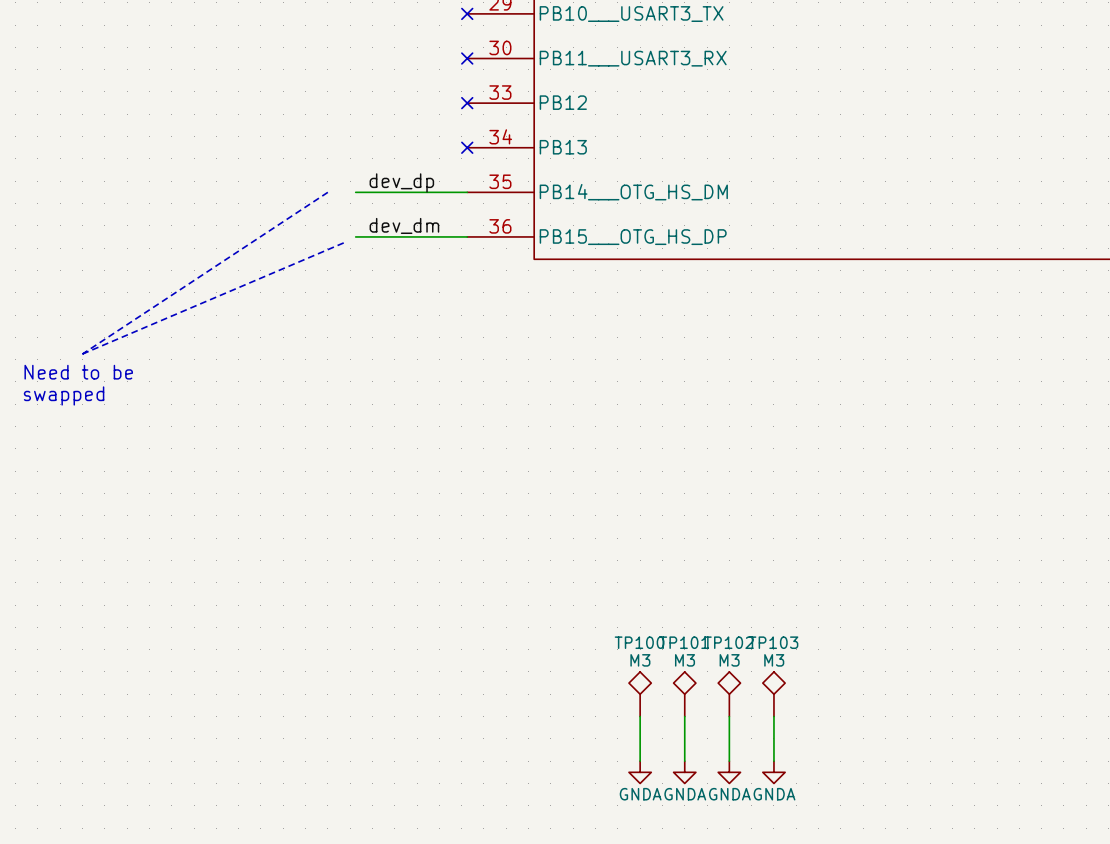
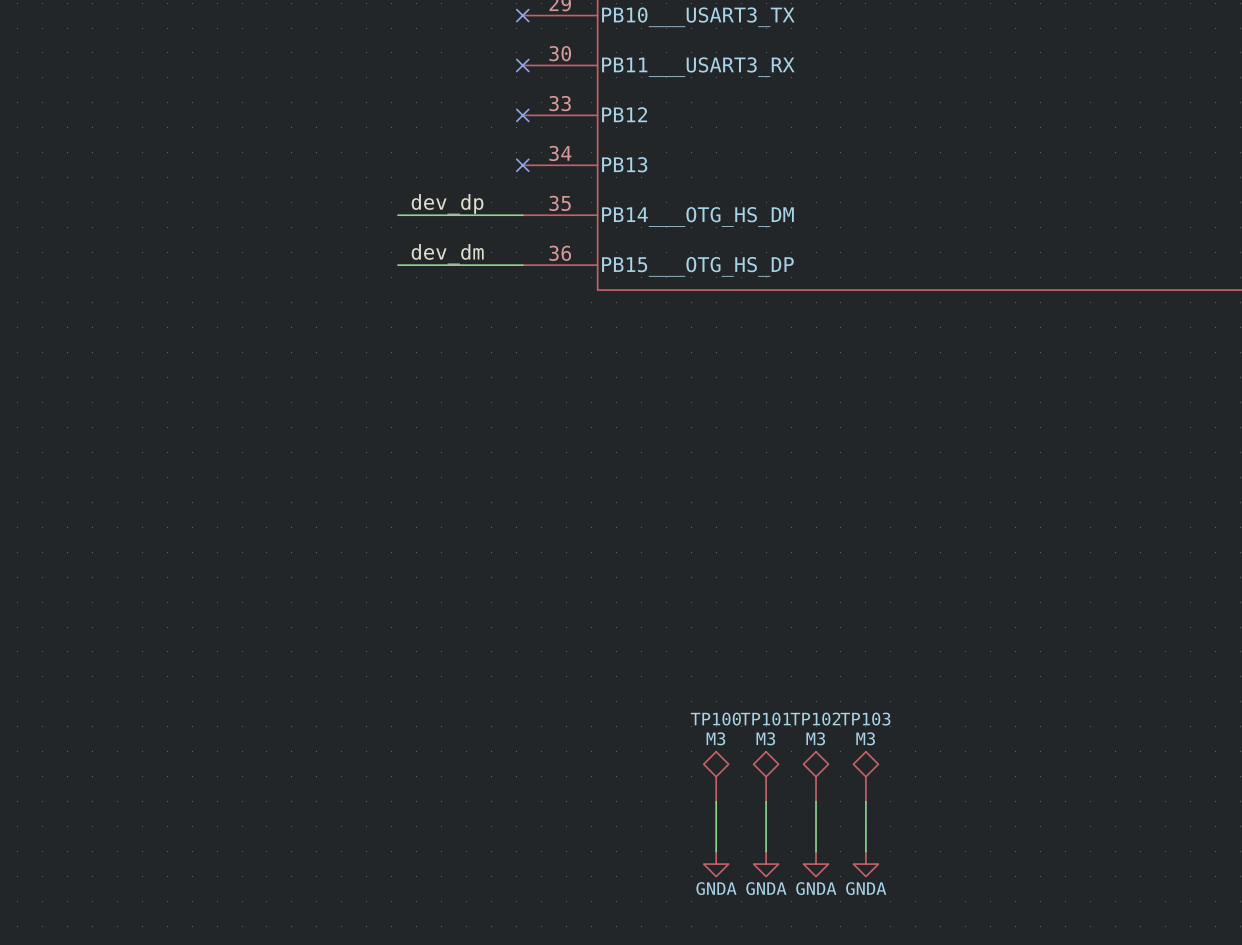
line: (327, 192) (82, 354) (344, 242) -> none
text: Need to be (78, 372) -> none
text: swapped (64, 395) -> none

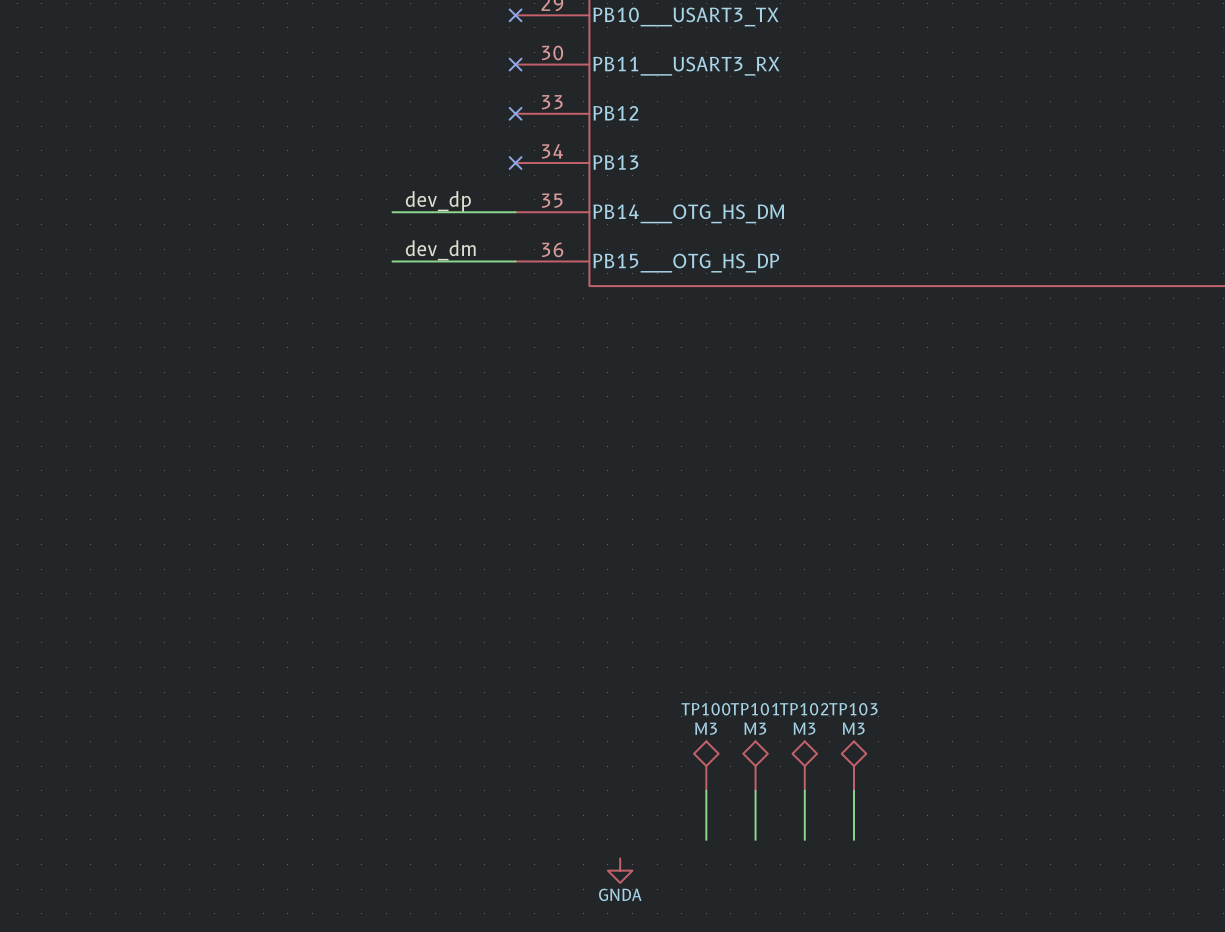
power symbol: GNDA (716, 864) -> none
power symbol: GNDA (766, 864) -> none
power symbol: GNDA (816, 864) -> none
power symbol: GNDA (865, 864) -> none
power symbol: none -> GNDA (620, 870)

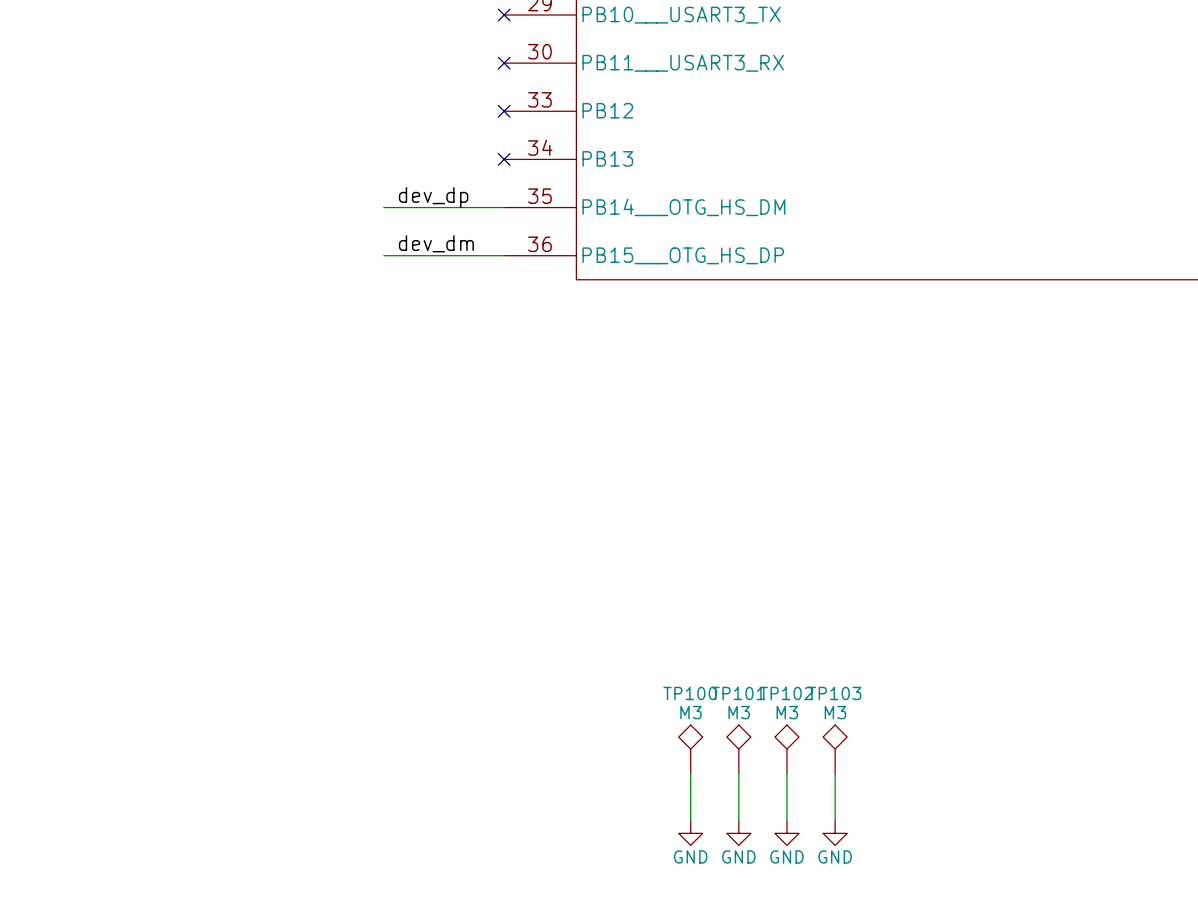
power symbol: none -> GND (690, 833)
power symbol: none -> GND (738, 833)
power symbol: none -> GND (786, 833)
power symbol: none -> GND (835, 833)
power symbol: GNDA (620, 870) -> none

